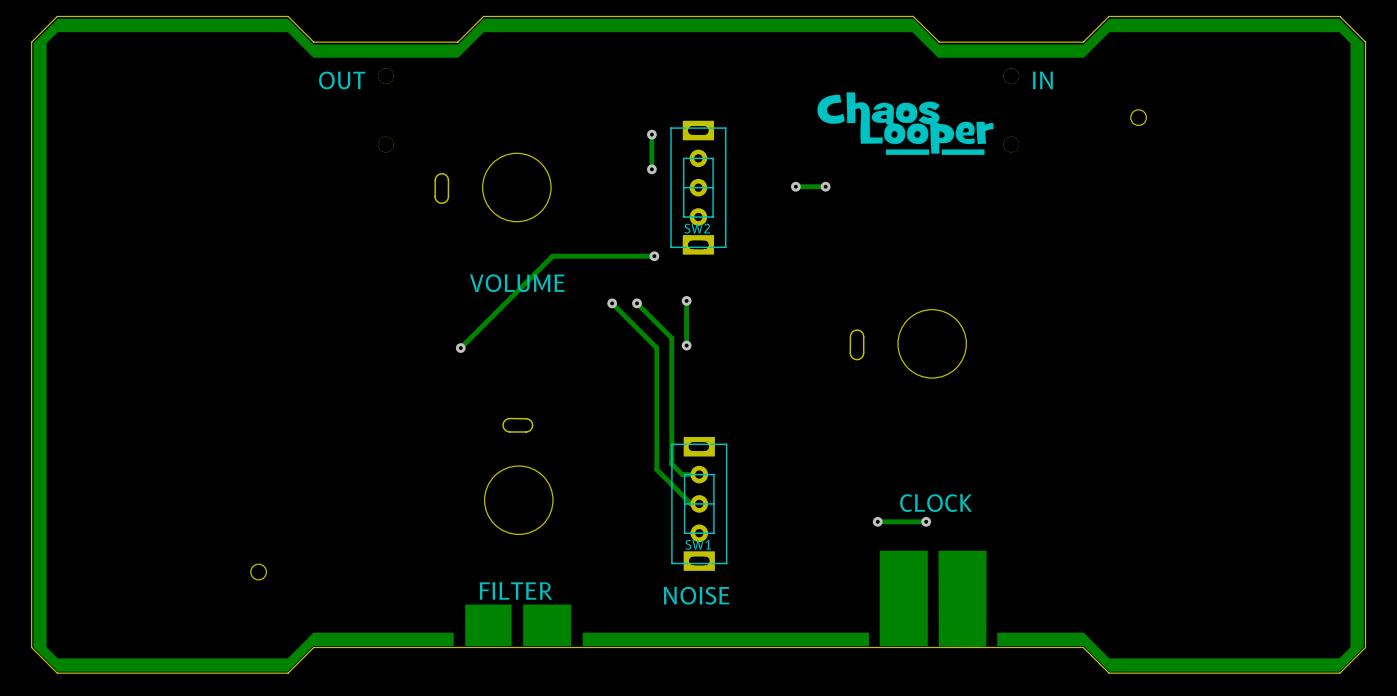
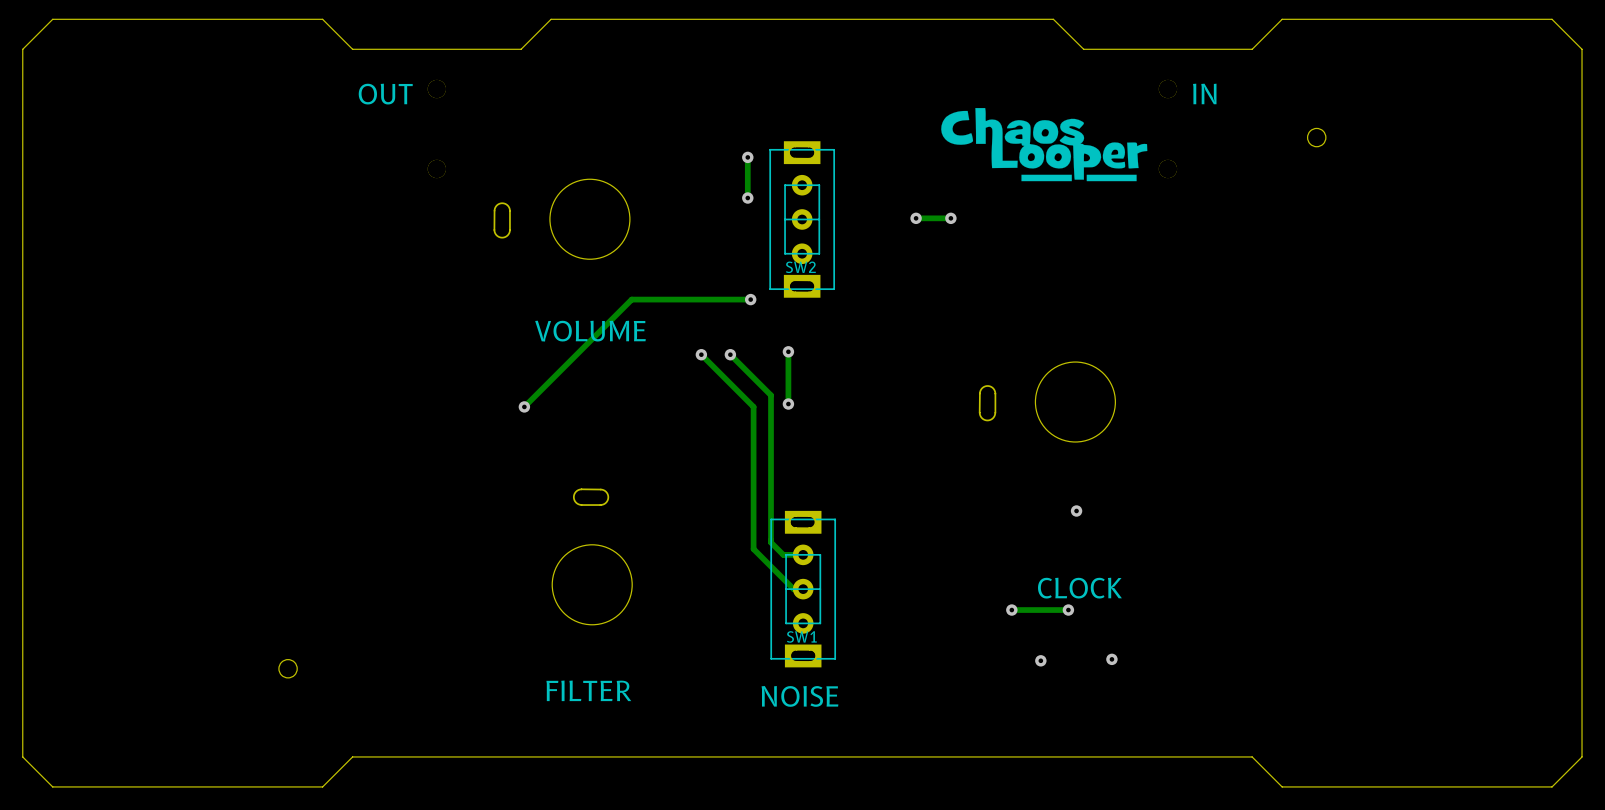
drawing: [33, 18, 1364, 672] -> none
via: none -> (1076, 510)
via: none -> (1111, 659)
via: none -> (1040, 660)

